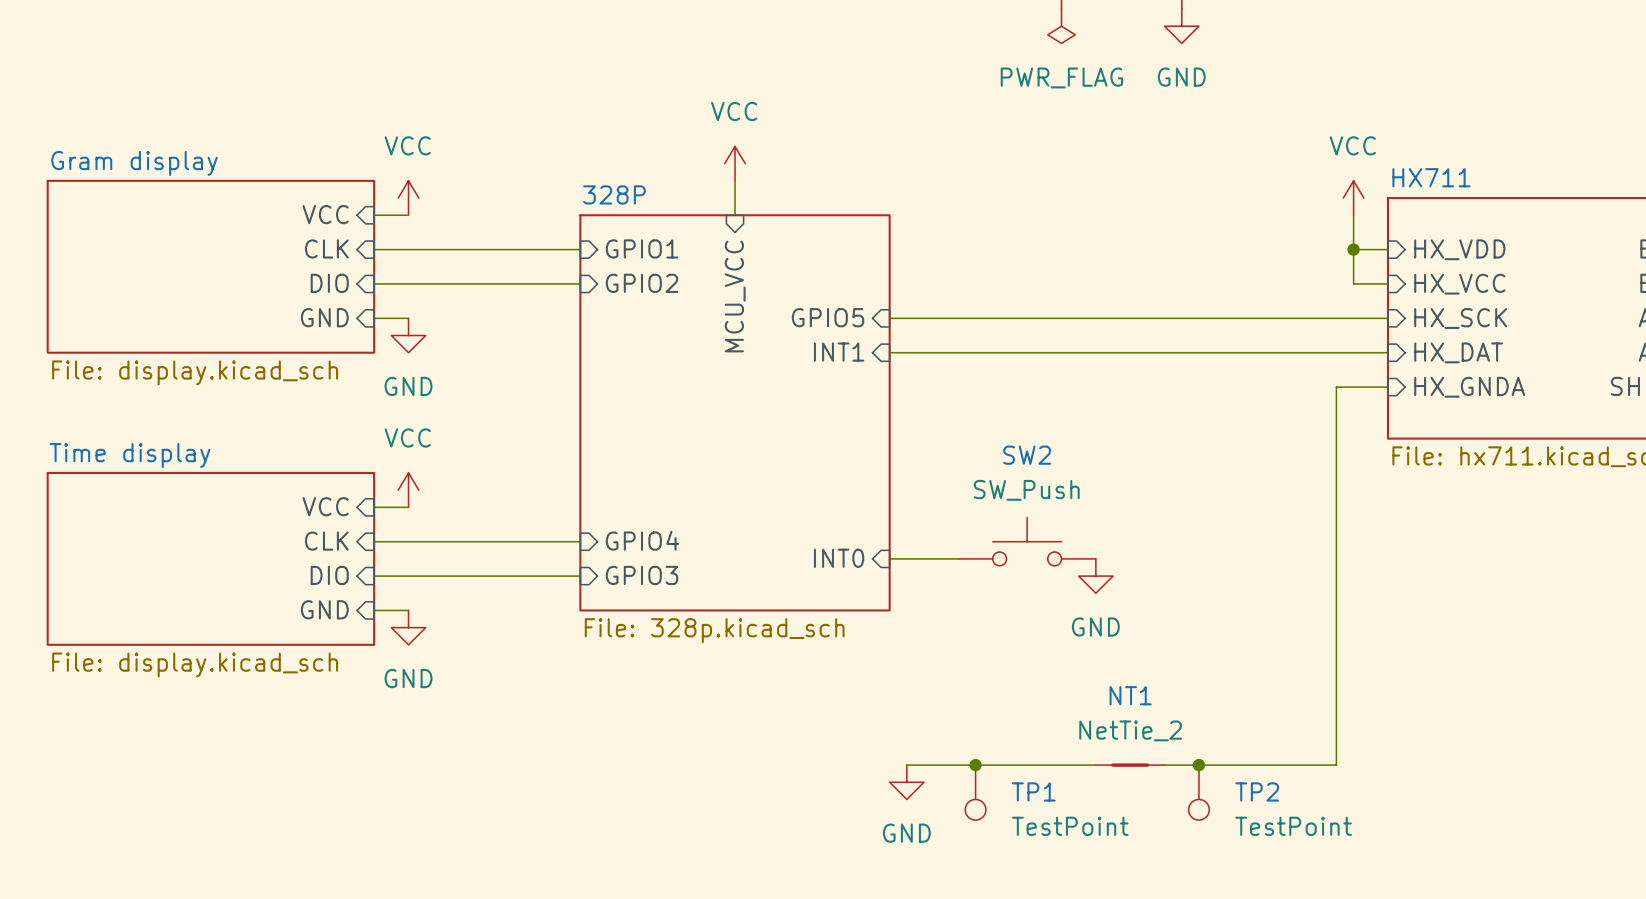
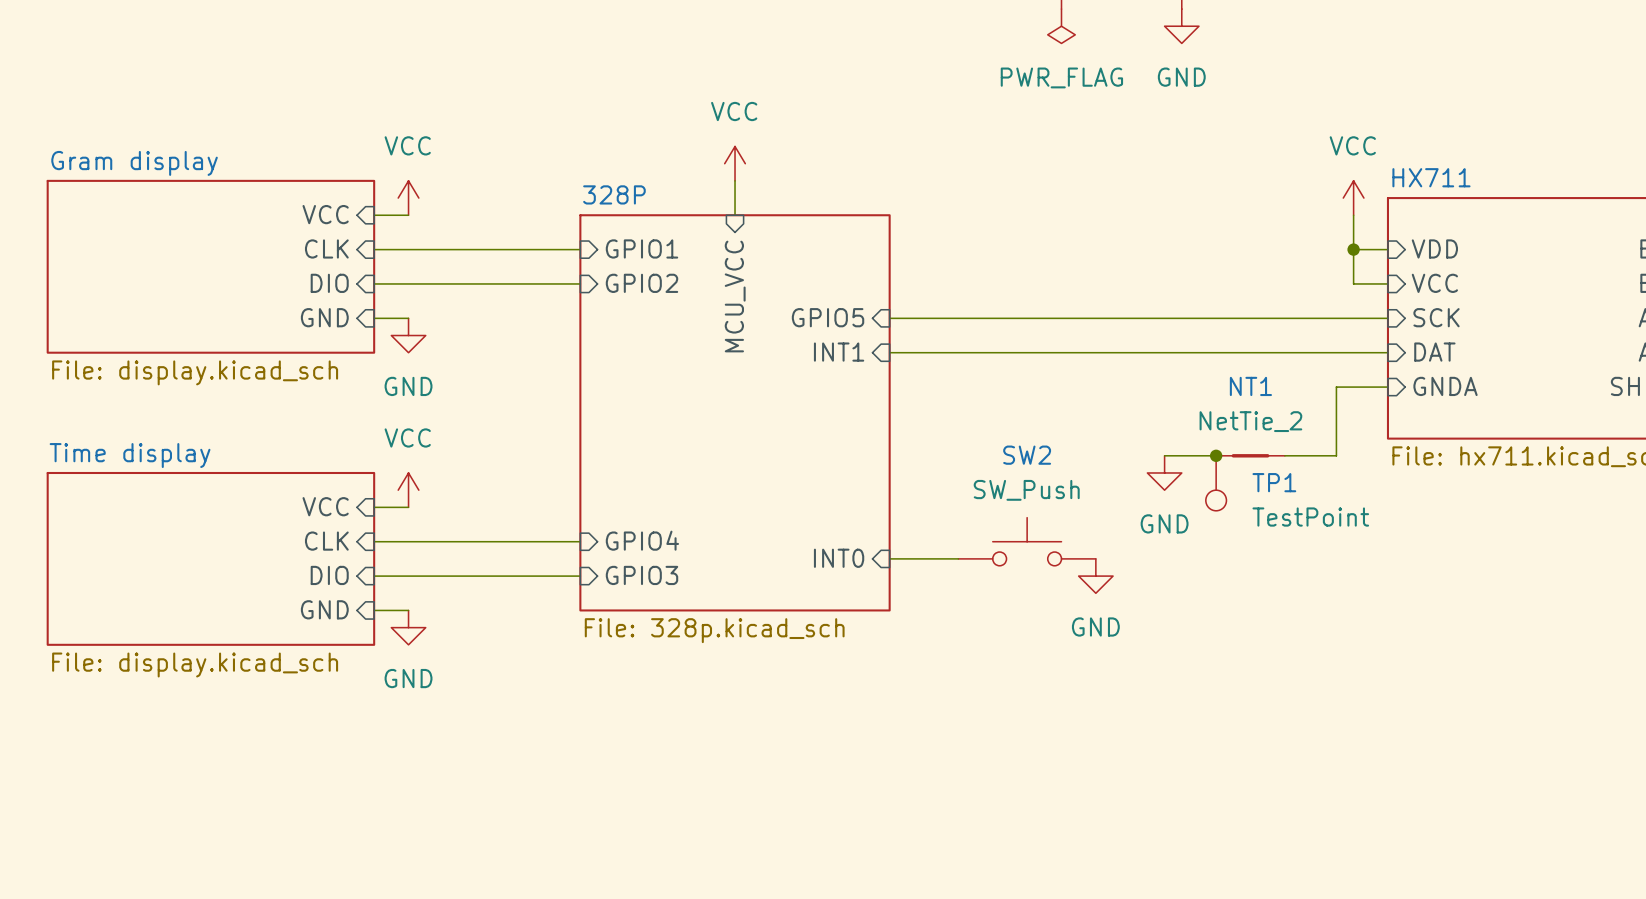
sheet pin: HX_VDD (1459, 249) -> VDD (1434, 248)
sheet pin: HX_VCC (1459, 284) -> VCC (1434, 283)
sheet pin: HX_SCK (1460, 318) -> SCK (1436, 317)
sheet pin: HX_DAT (1458, 352) -> DAT (1434, 352)
sheet pin: HX_GNDA (1469, 387) -> GNDA (1445, 386)
wire: none -> (1164, 455) (1216, 455)
junction: none -> (1216, 455)
wire: (1336, 455) (1336, 765) (1164, 765) -> (1336, 455) (1284, 455)
power symbol: none -> GND (1164, 472)
wire: (906, 765) (1095, 765) -> none
junction: (975, 765) -> none
NT1 position: (1130, 765) -> (1250, 455)
junction: (1198, 765) -> none
power symbol: GND (906, 782) -> none
TP1 position: (975, 792) -> (1216, 483)
TP2: TestPoint (1198, 792) -> none

